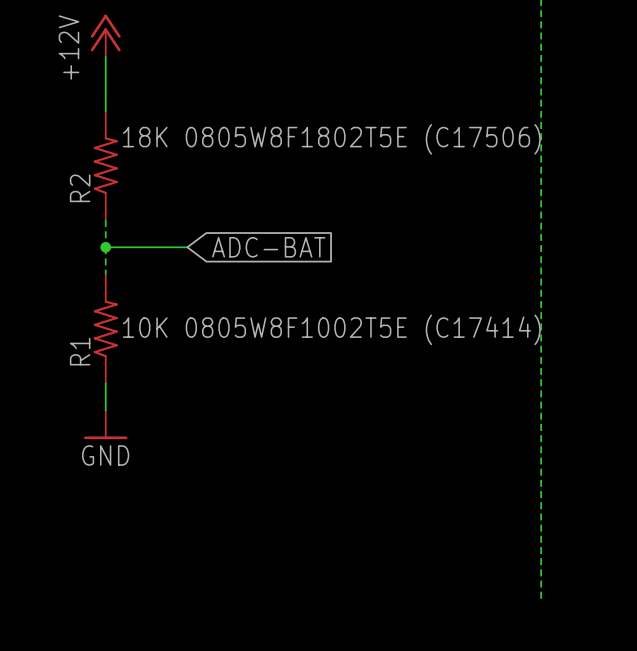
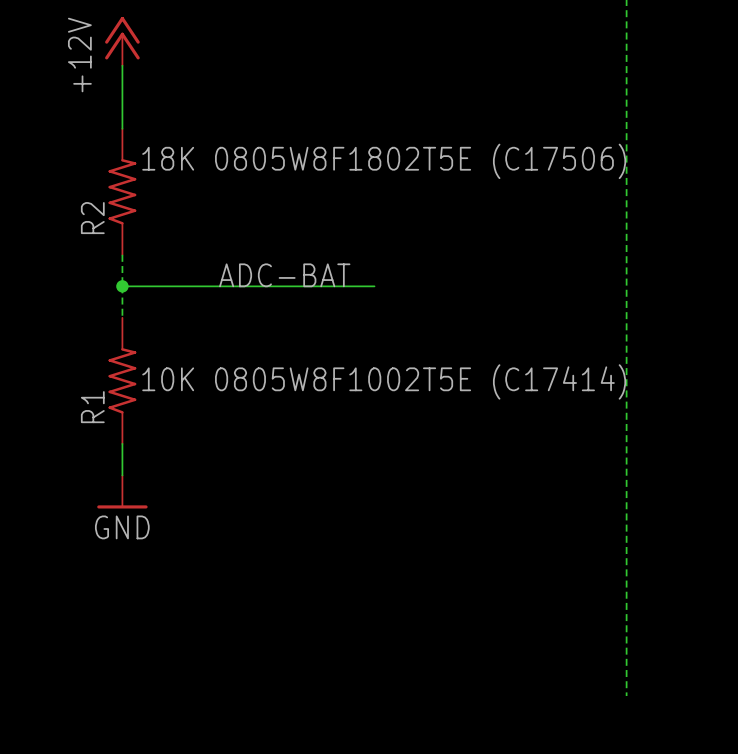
label: none -> ADC-BAT (284, 275)
wire: none -> (216, 286) (374, 286)
global label: ADC-BAT (268, 247) -> none

